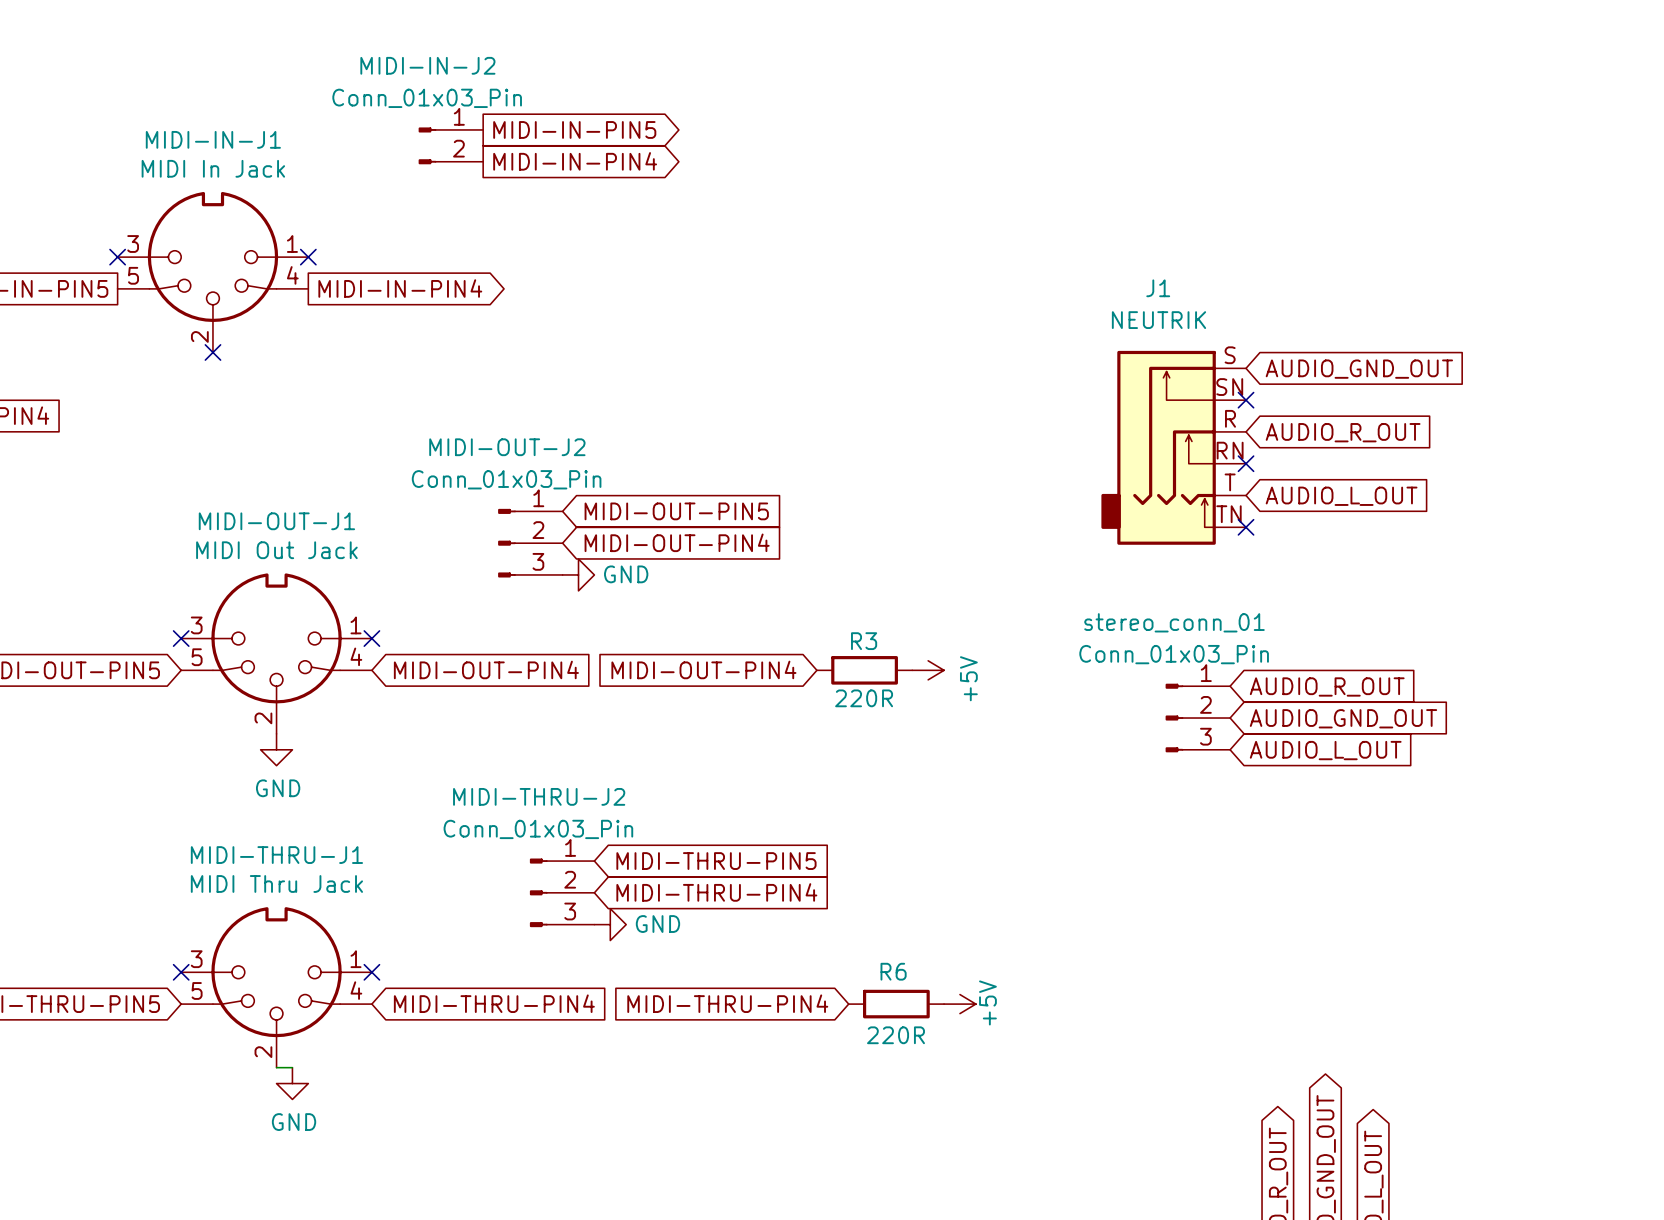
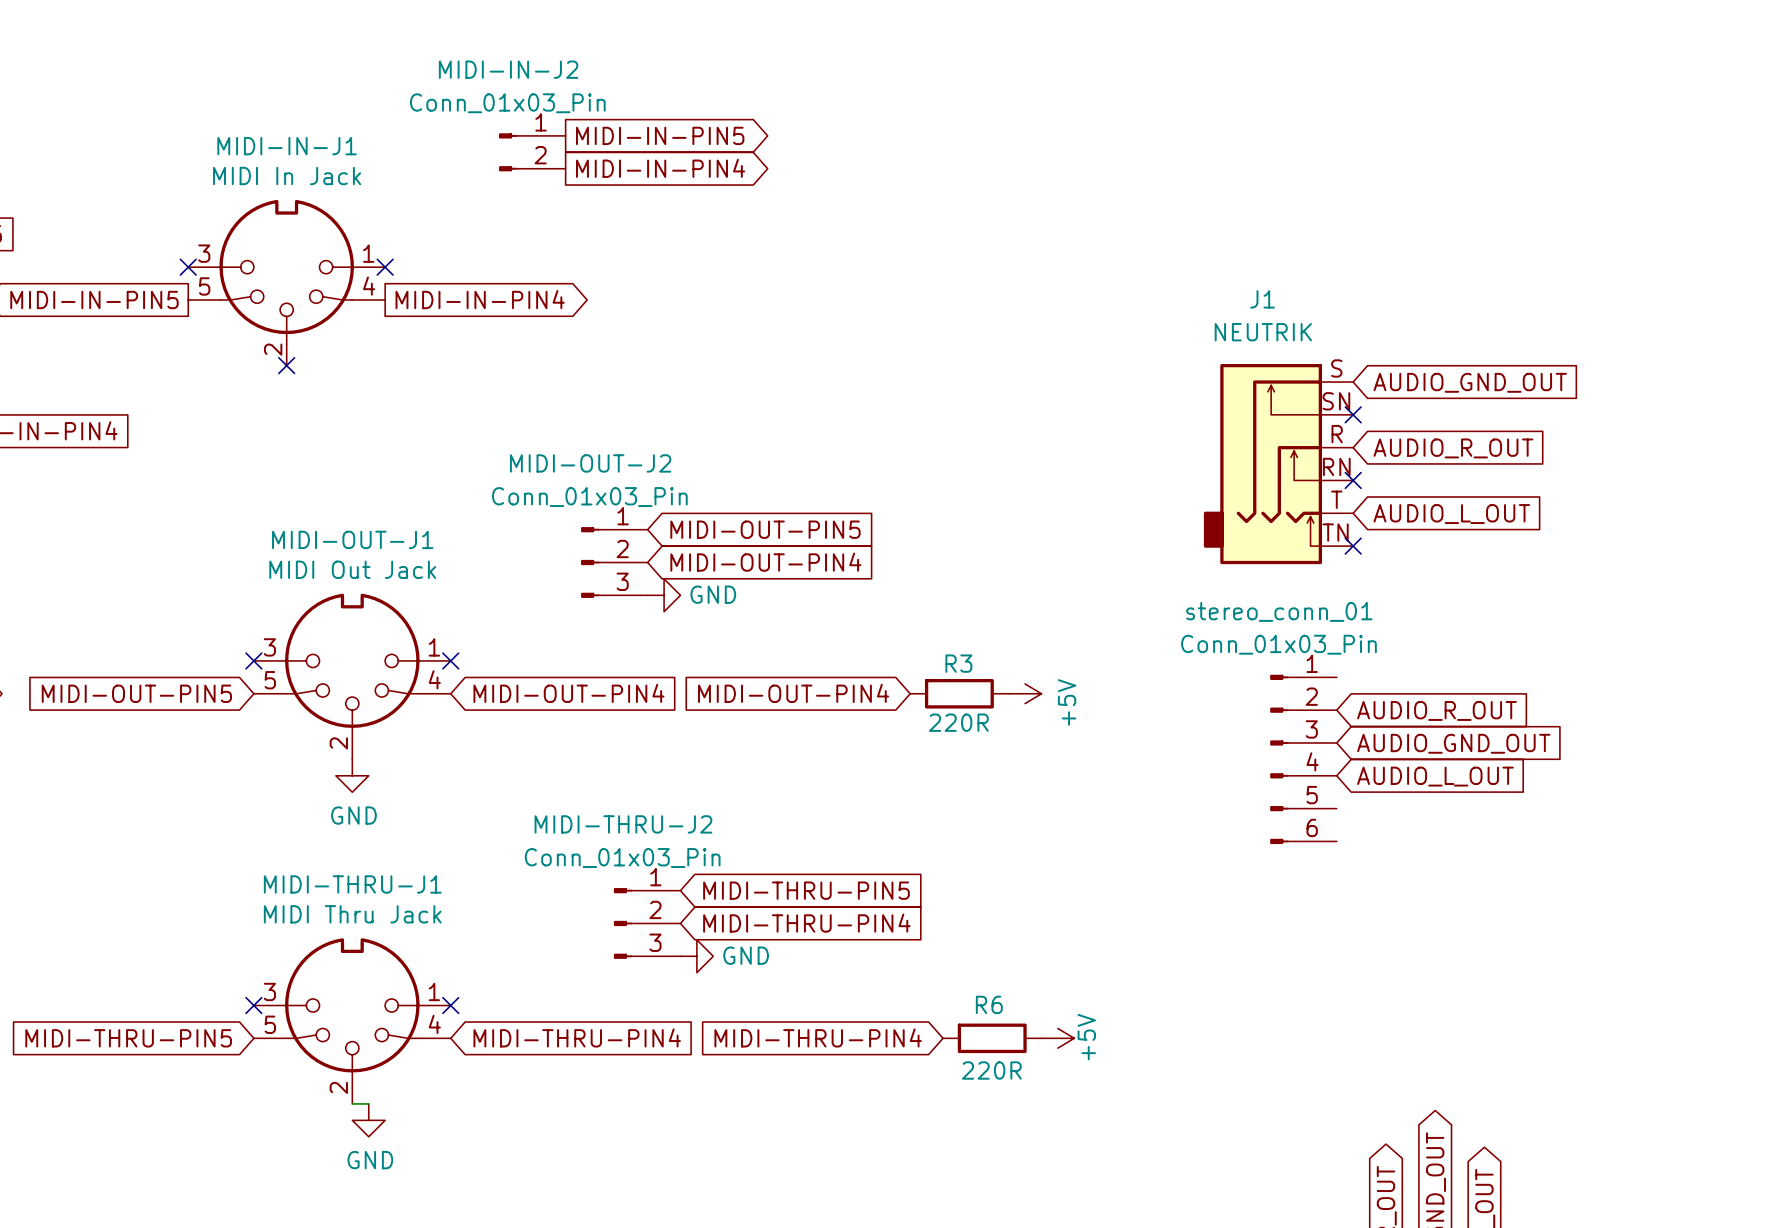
stereo_conn_01 name position: stereo_conn_01 (1174, 622) -> stereo_conn_01 (1279, 611)
stereo_conn_01 value position: Conn_01x03_Pin (1174, 654) -> Conn_01x03_Pin (1278, 644)
stereo_conn_01 symbol: [1165, 683, 1231, 753] -> [1270, 674, 1337, 845]

